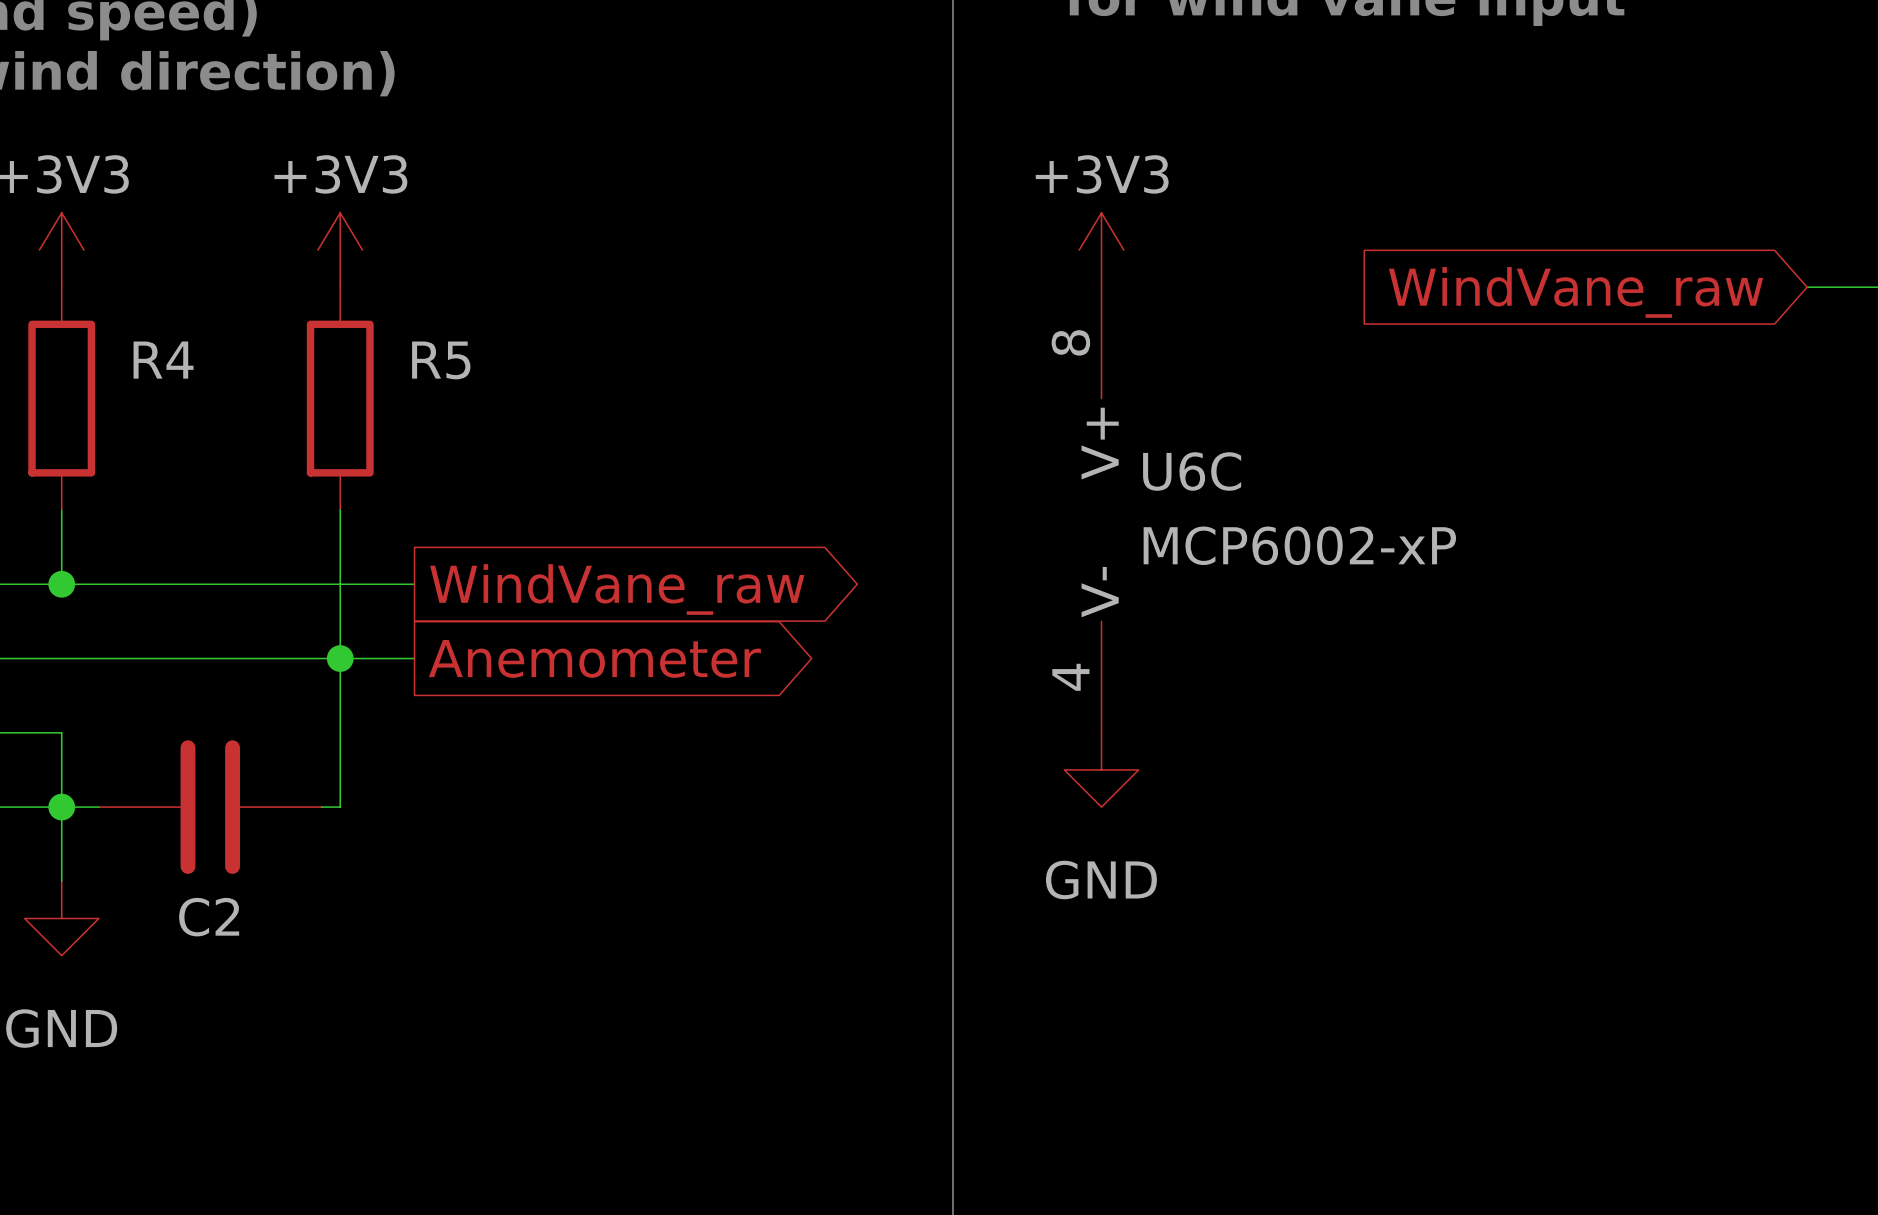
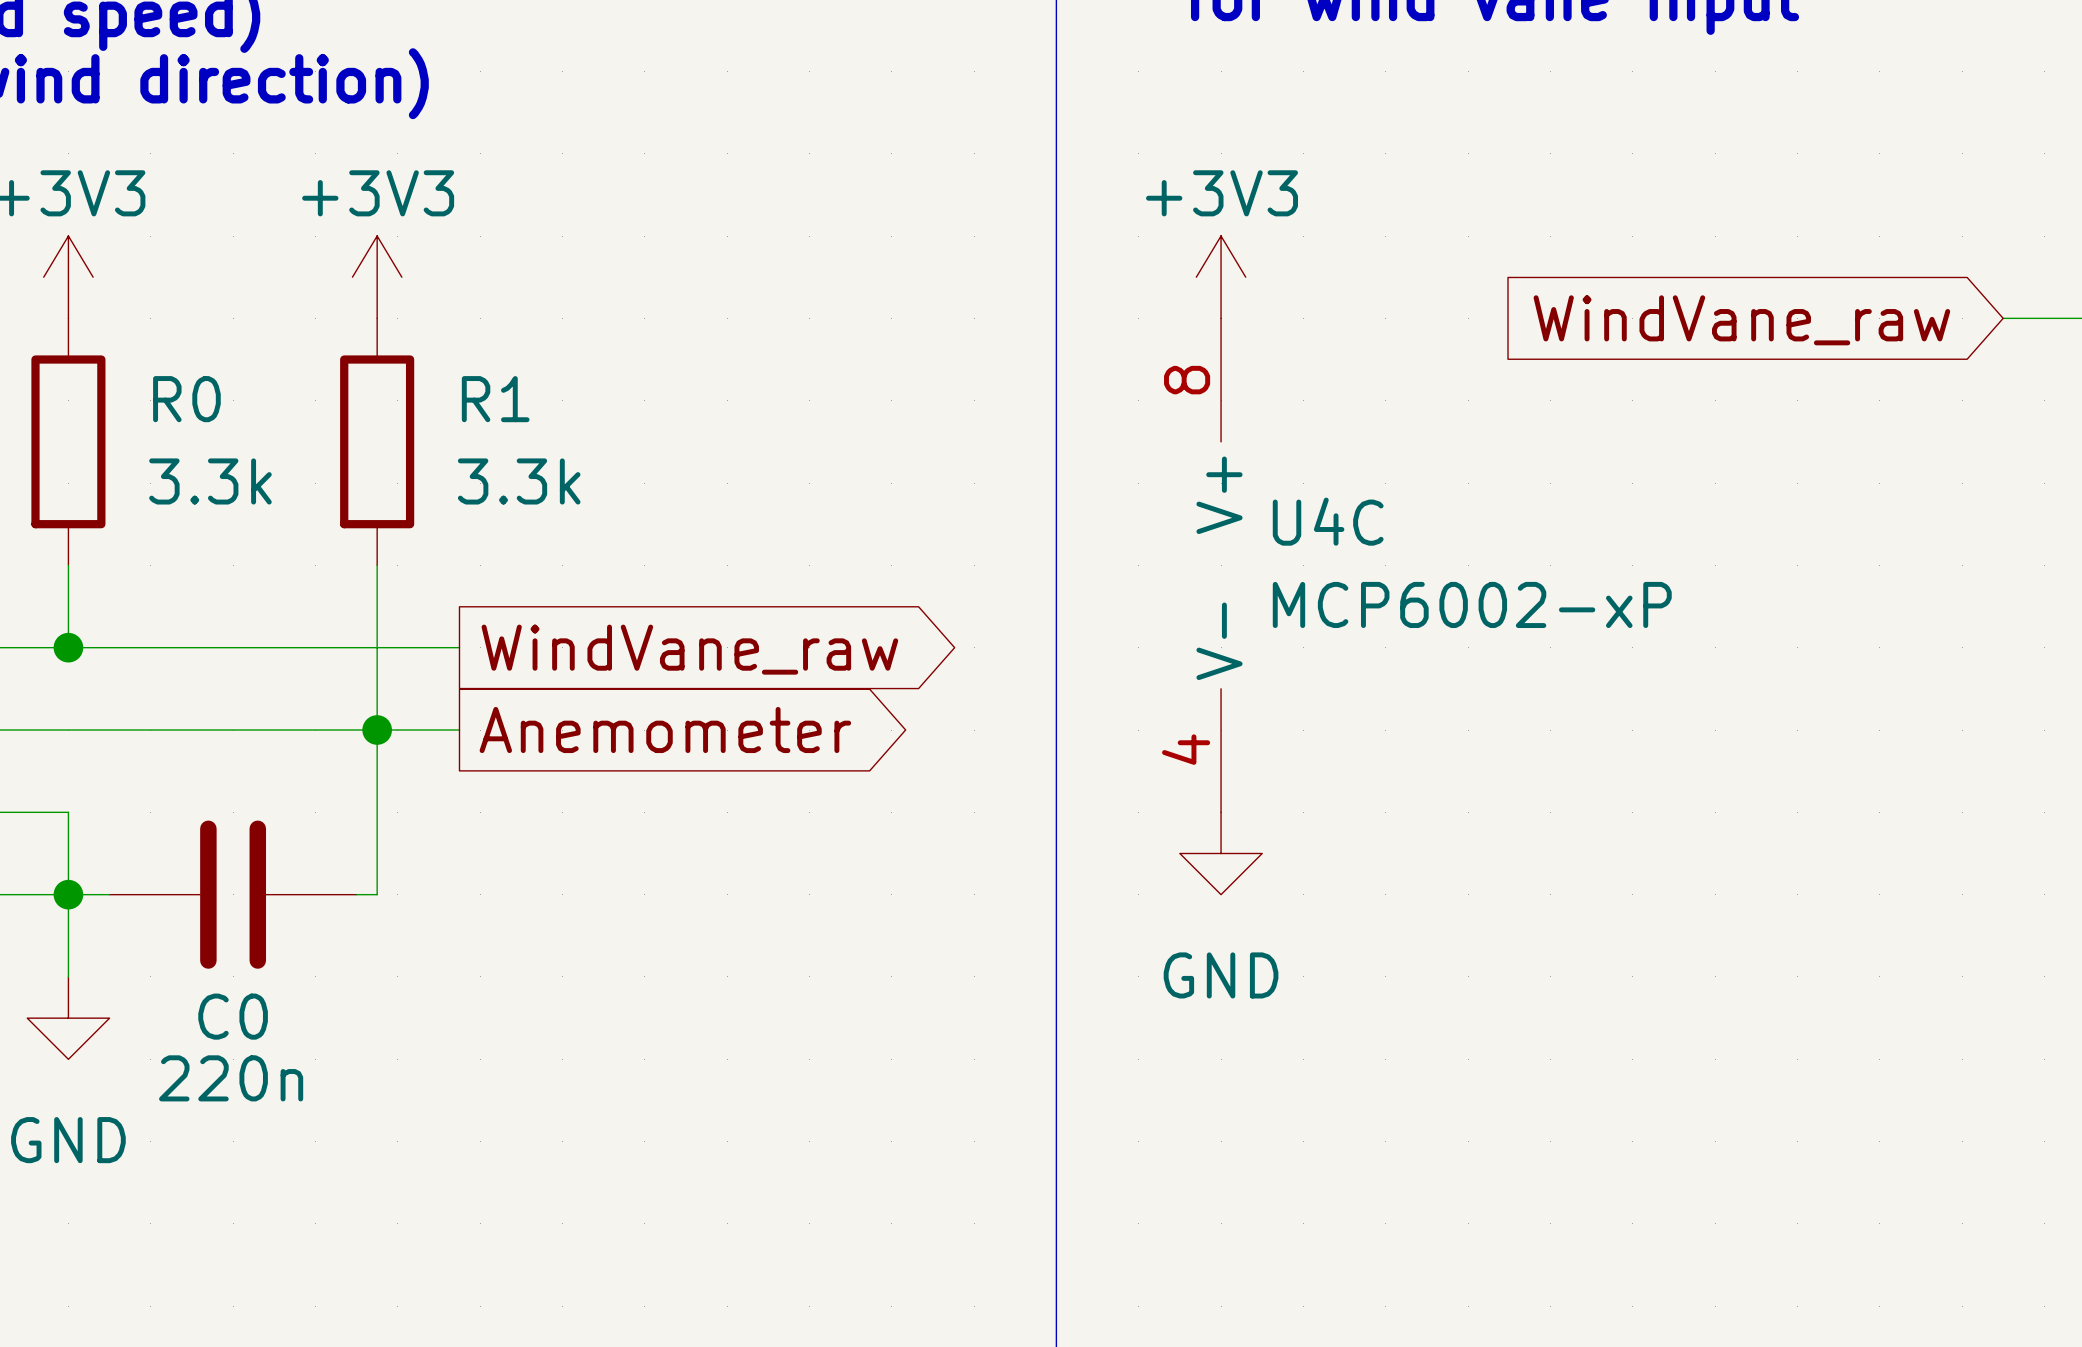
R4 name: R4 (163, 360) -> R0 (186, 399)
R5 name: R5 (441, 360) -> R1 (495, 399)
R4 value: none -> 3.3k (210, 481)
R5 value: none -> 3.3k (519, 481)
U6C name: U6C (1192, 471) -> U4C (1328, 521)
C2 name: C2 (209, 917) -> C0 (233, 1016)
C2 value: none -> 220n (231, 1078)

